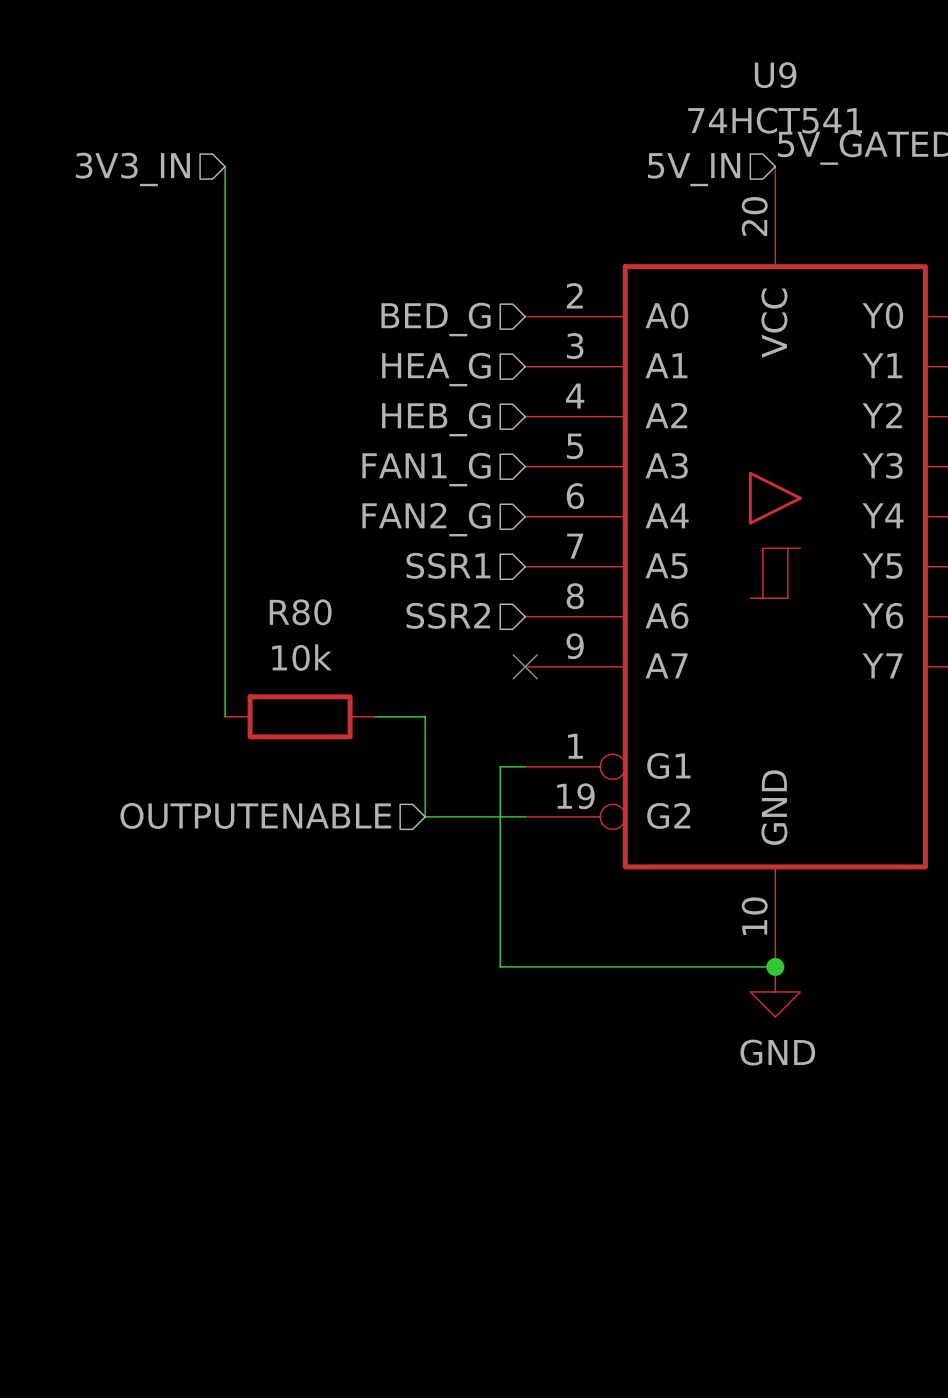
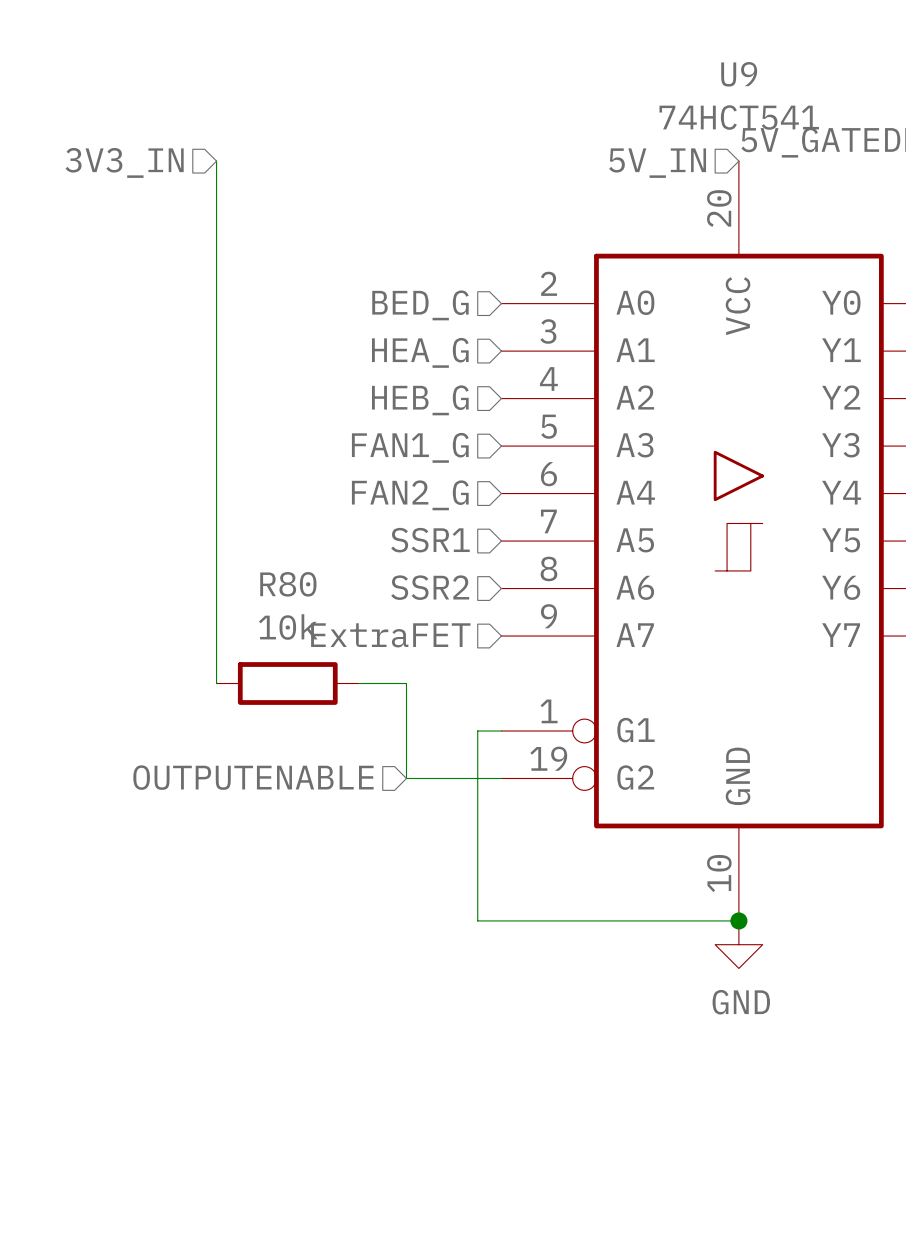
hierarchical label: none -> ExtraFET (390, 635)
no-connect mark: (525, 666) -> none

